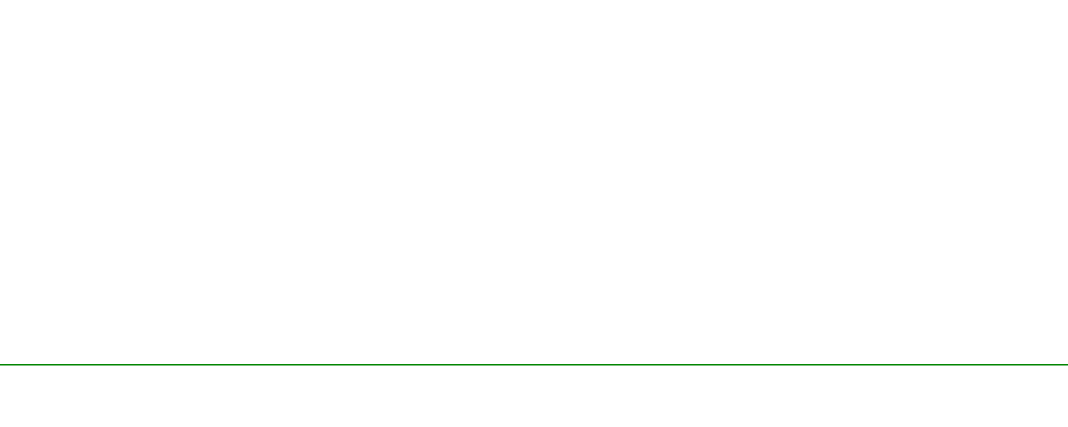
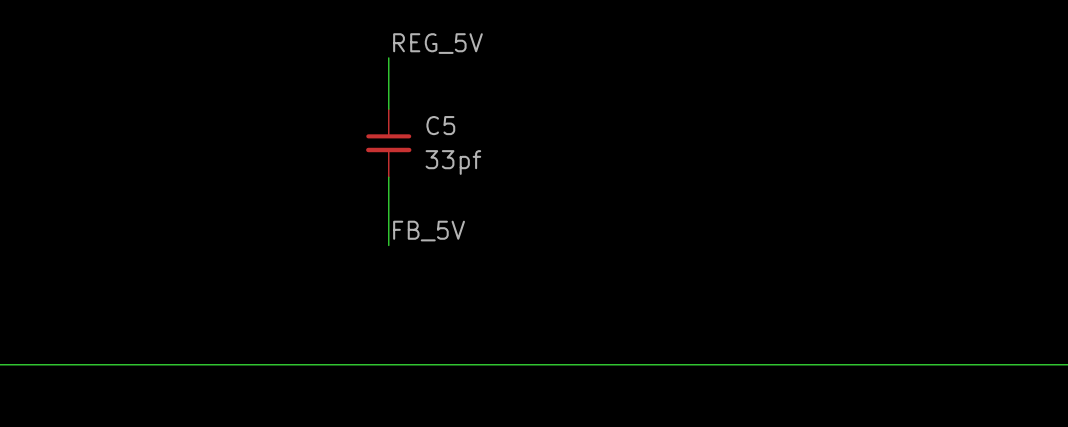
label: none -> REG_5V (437, 43)
wire: none -> (388, 57) (388, 109)
C5: none -> 33pf (388, 143)
wire: none -> (388, 177) (388, 245)
label: none -> FB_5V (429, 231)

